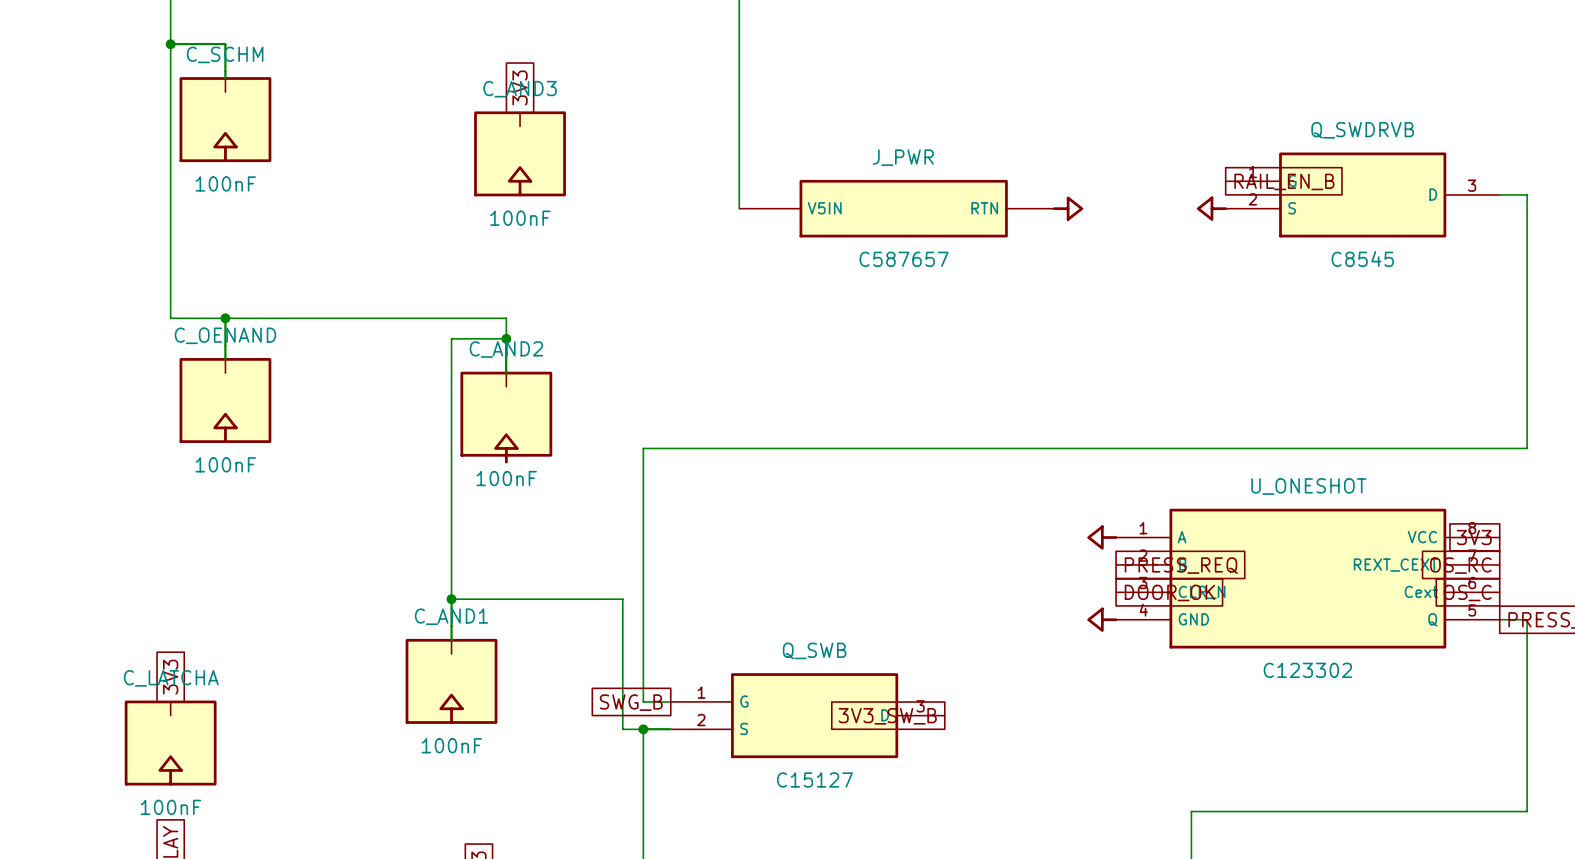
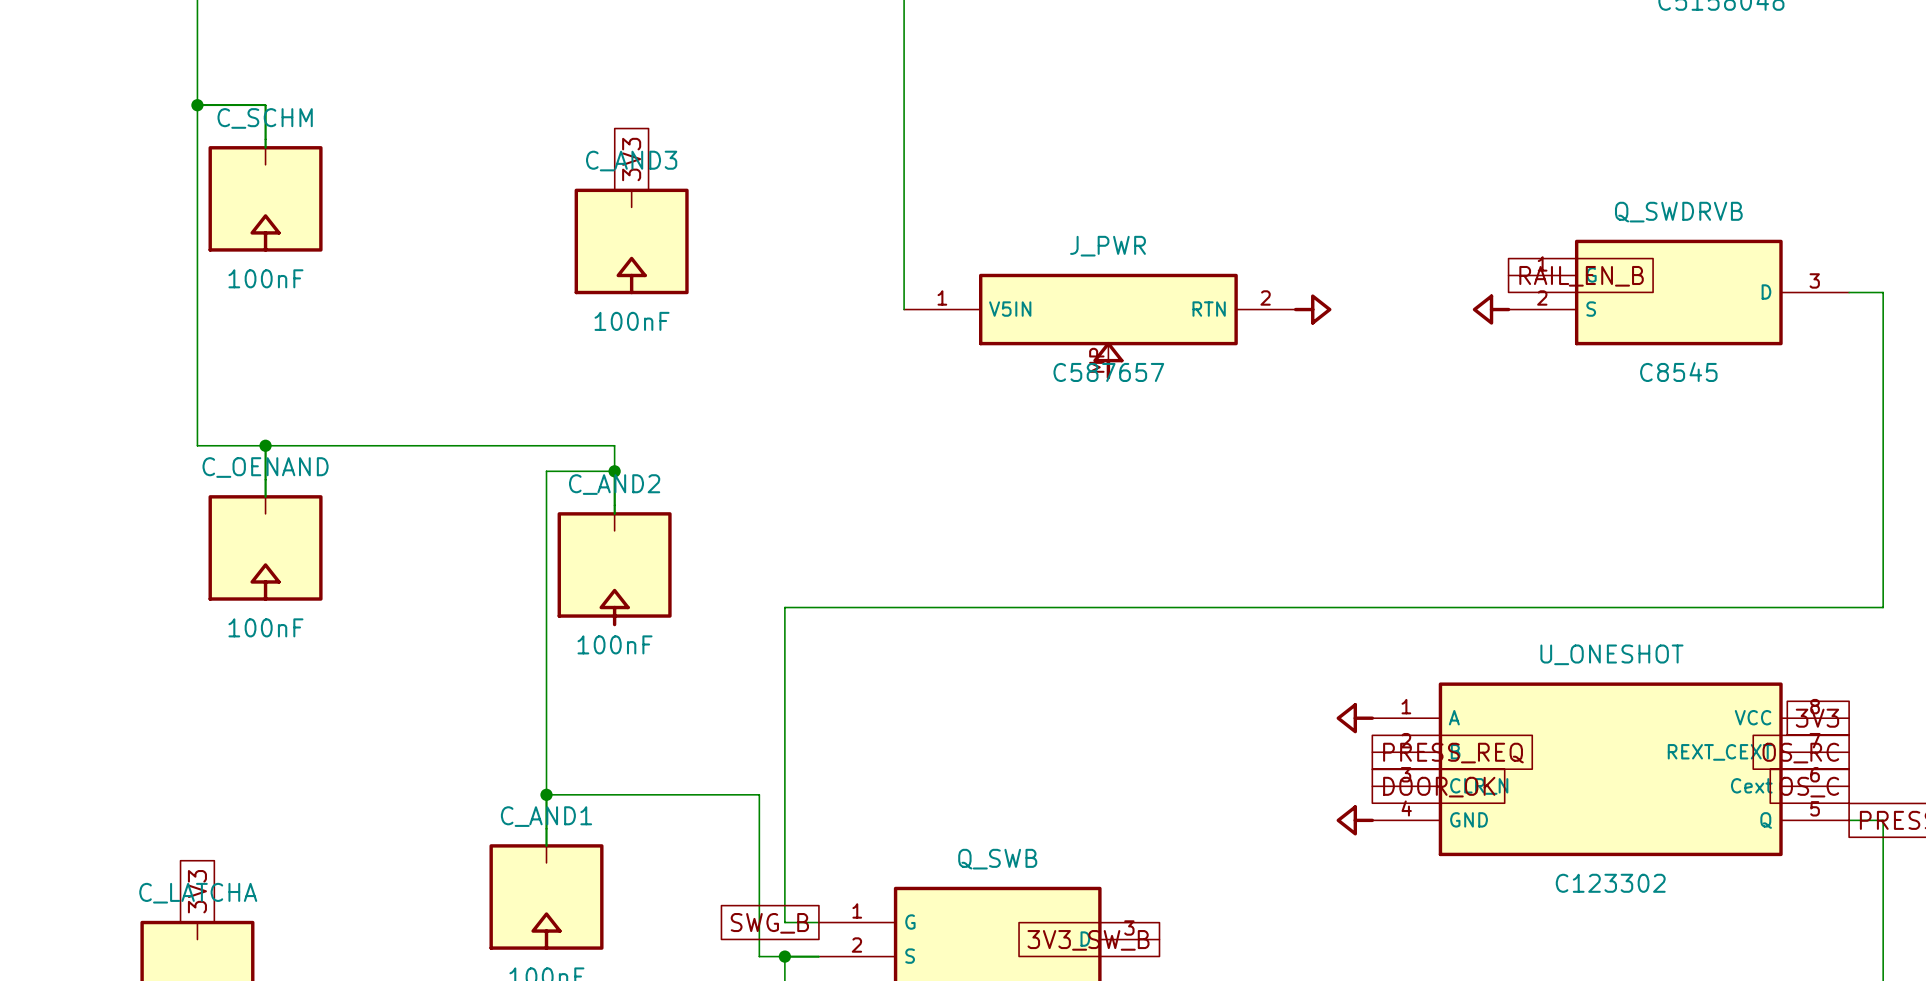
J_PWR: C587657 (896, 208) -> none
J_PWR: none -> C587657 (1099, 325)
power symbol: none -> (1108, 360)

